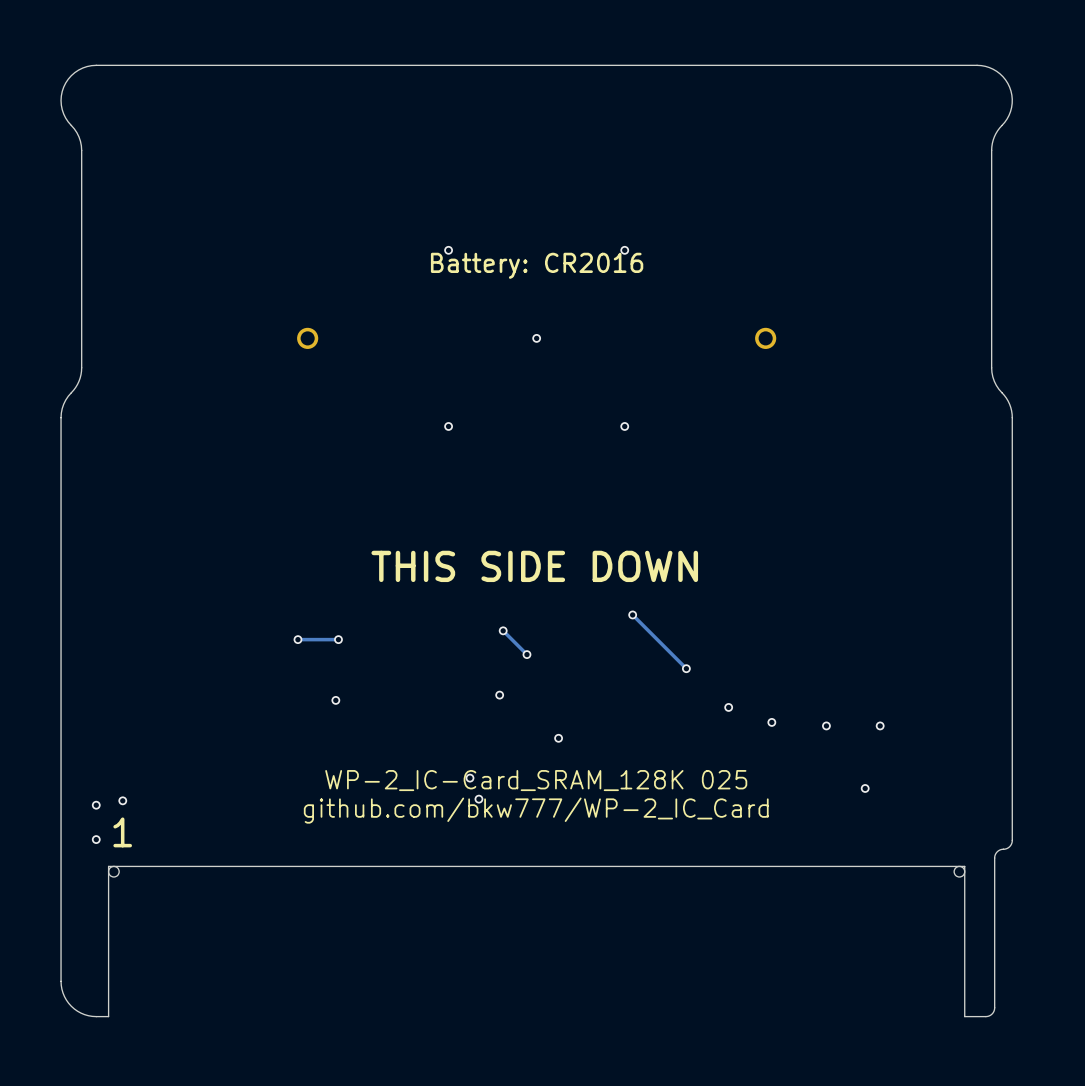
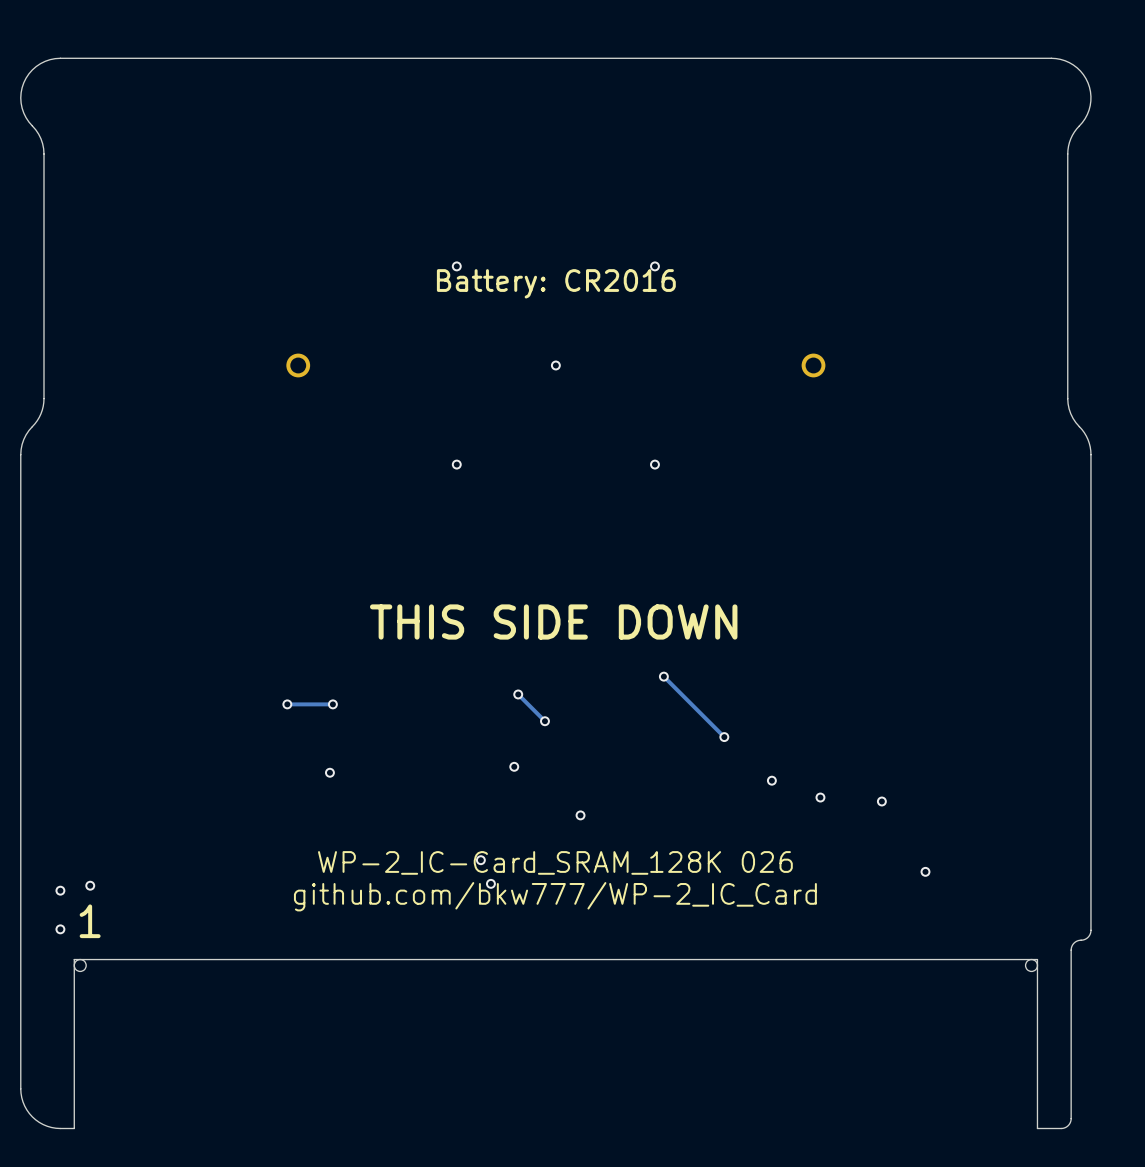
via: (880, 725) -> none
text: WP-2_IC-Card_SRAM_128K 025 (536, 780) -> WP-2_IC-Card_SRAM_128K 026 (555, 862)

